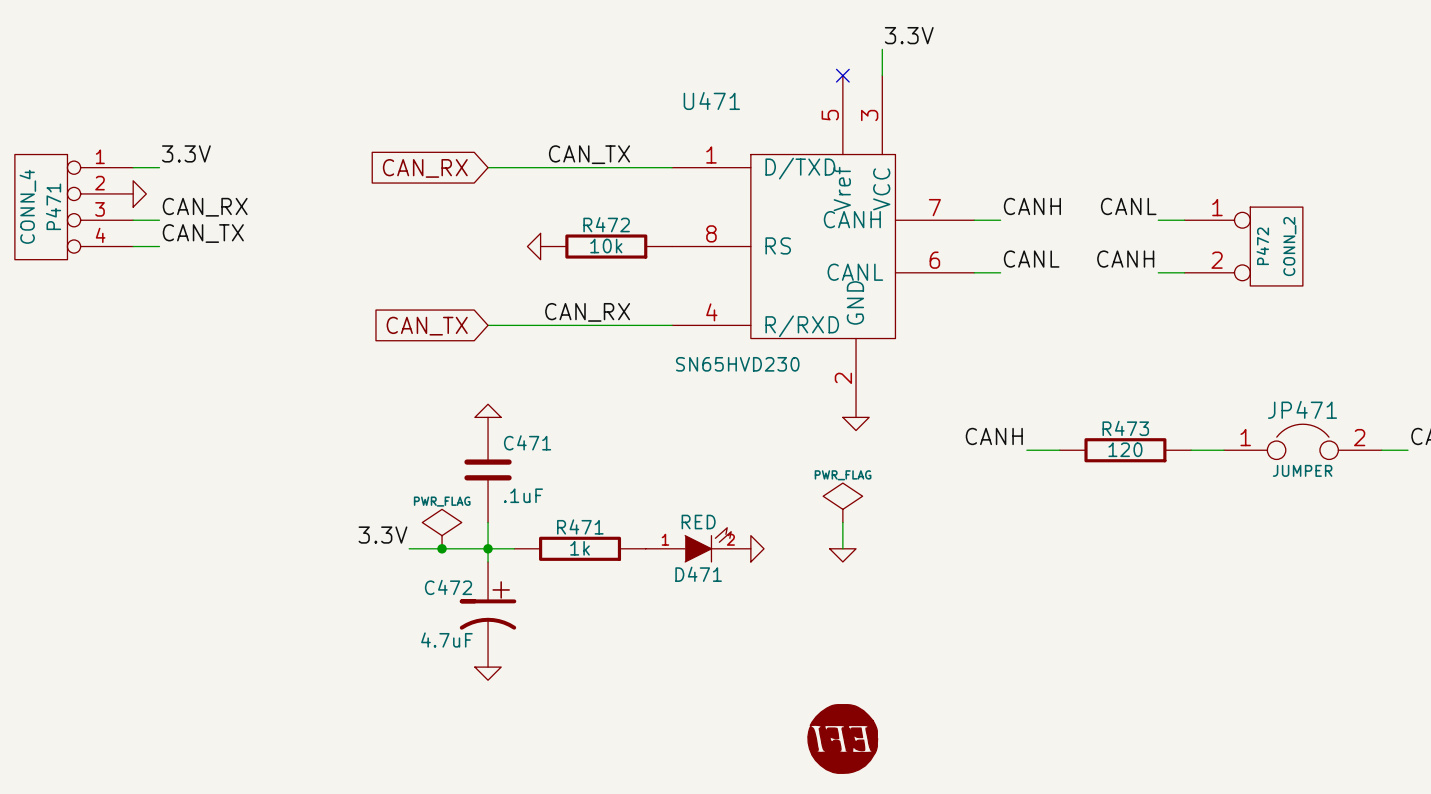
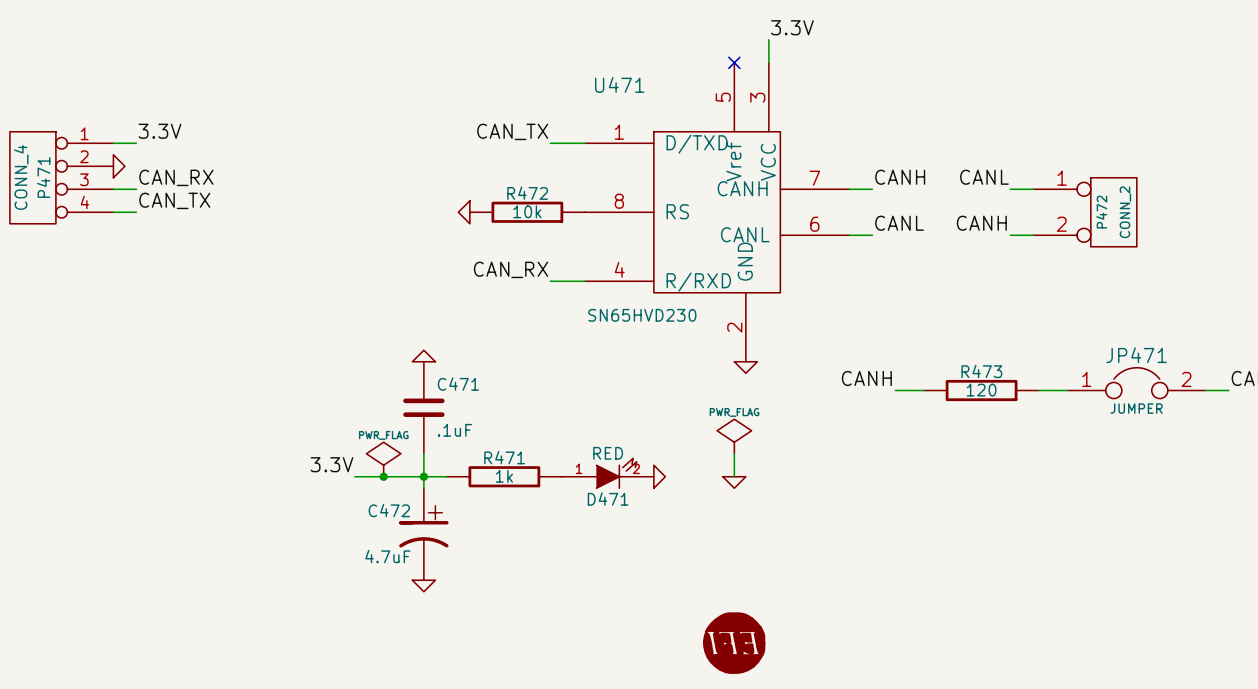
wire: (488, 167) (632, 167) -> none
global label: CAN_RX (425, 168) -> none
wire: (488, 325) (632, 325) -> none
global label: CAN_TX (427, 326) -> none

